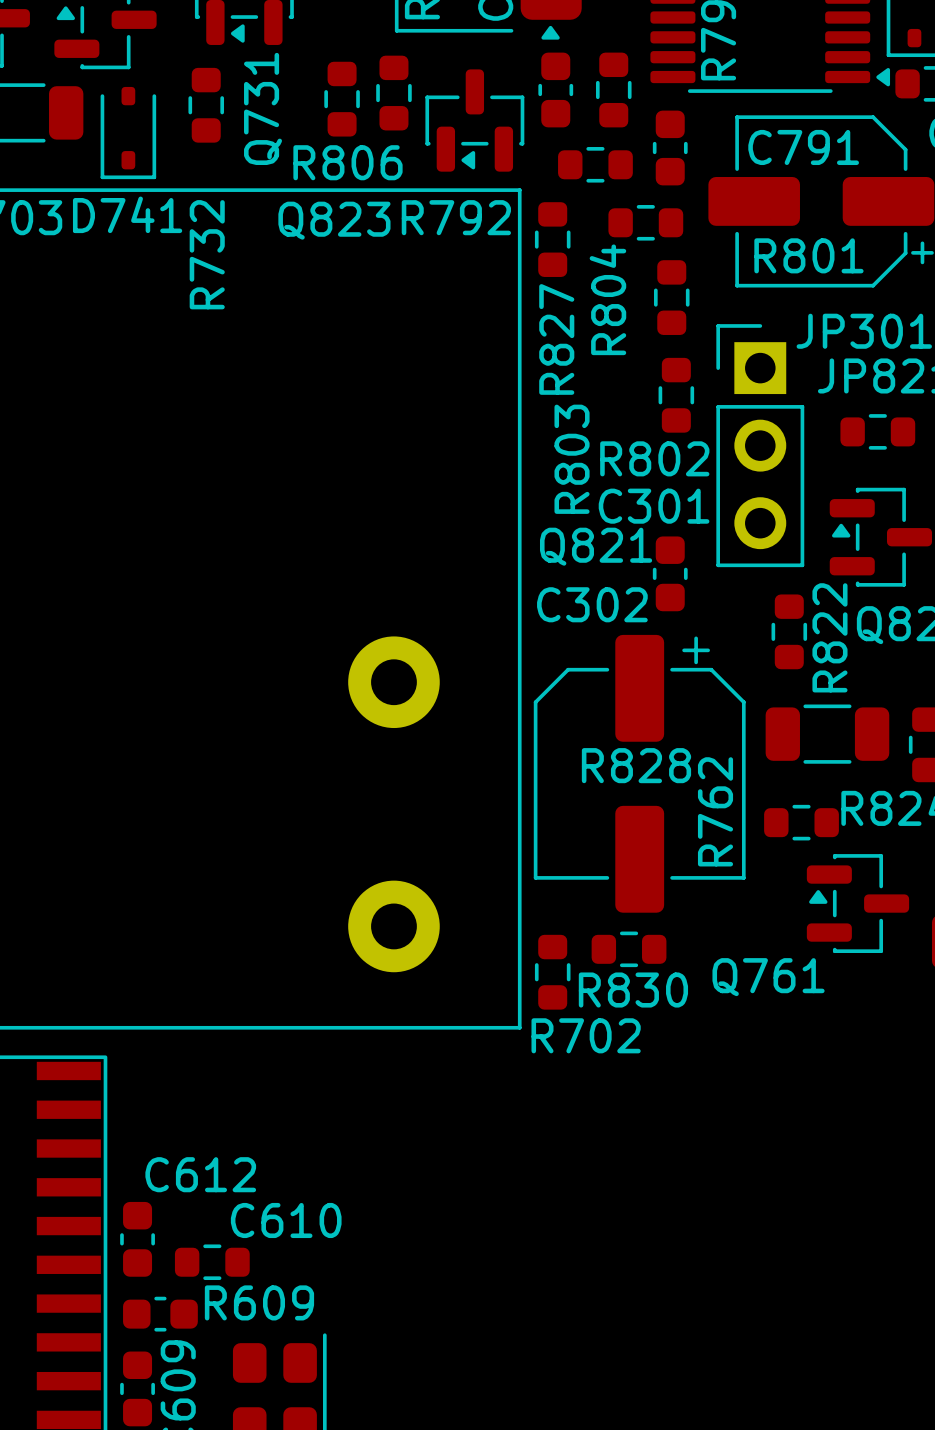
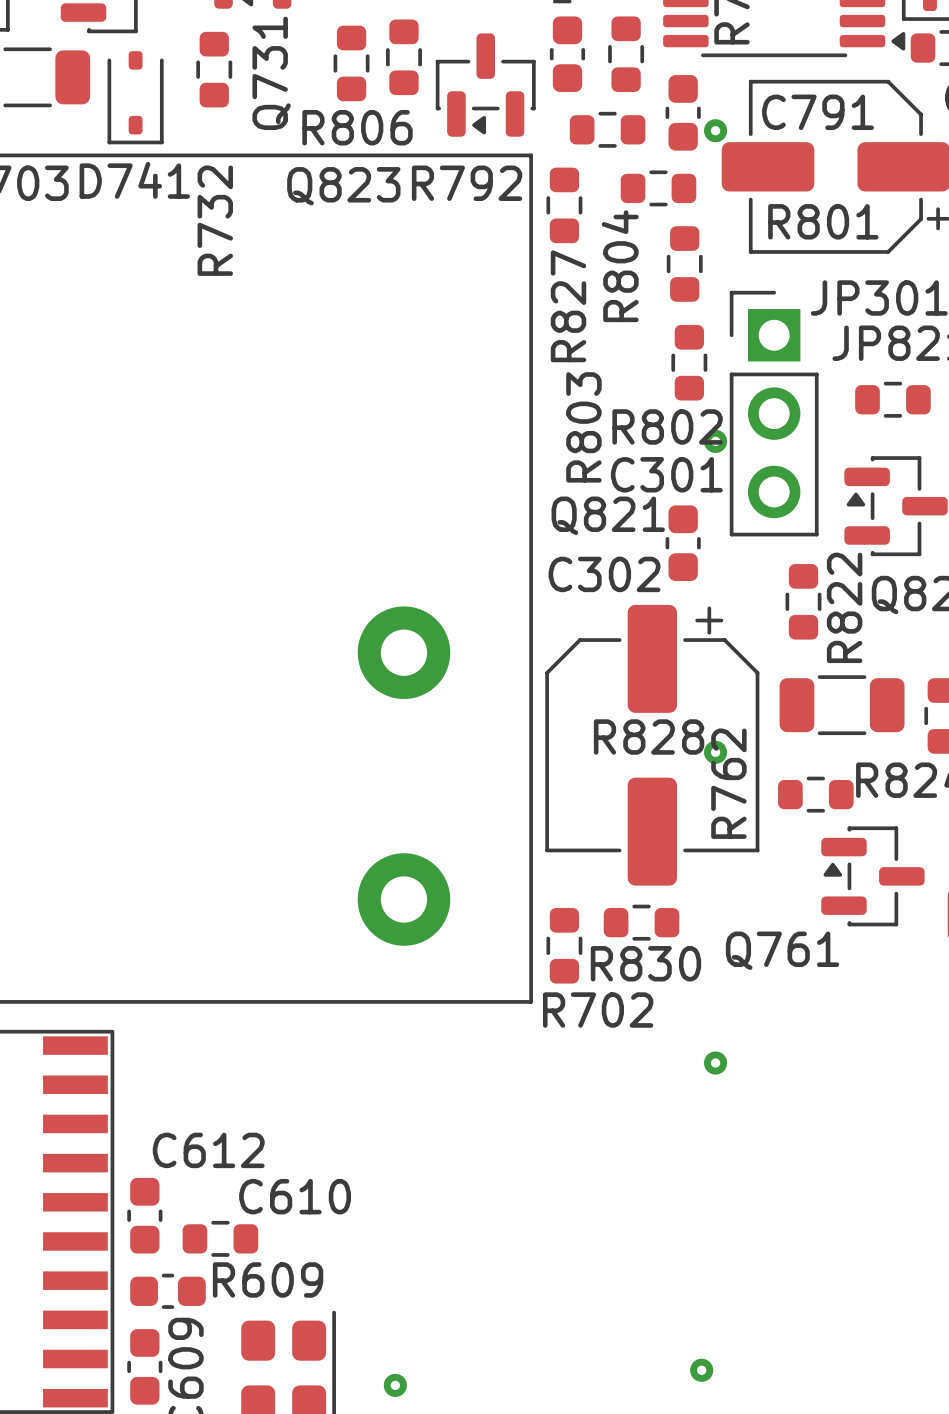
via: none -> (715, 130)
via: none -> (715, 441)
via: none -> (715, 752)
via: none -> (715, 1063)
via: none -> (701, 1370)
via: none -> (395, 1385)

